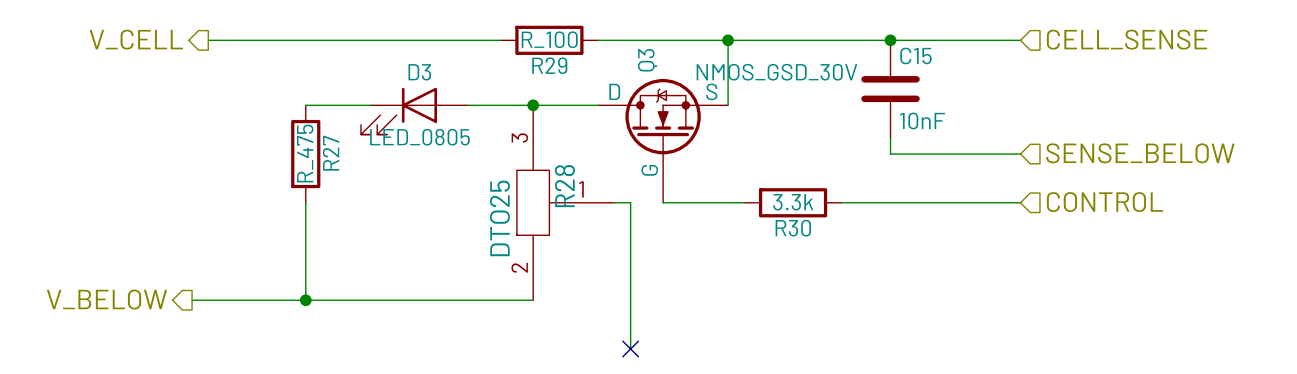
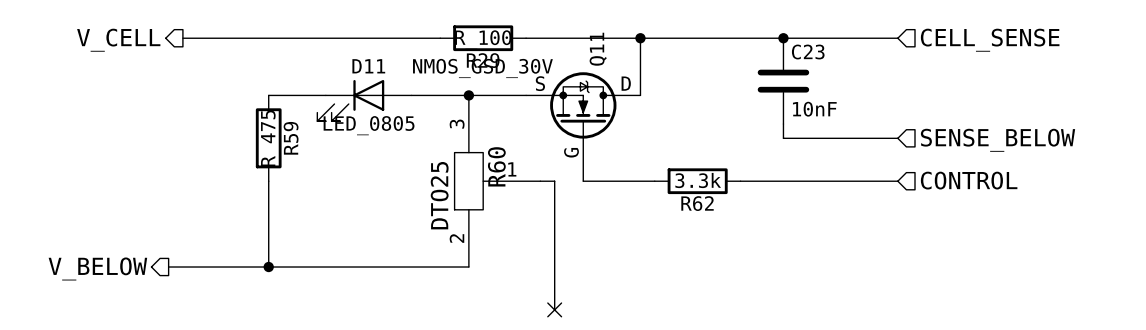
C15 name: C15 (915, 55) -> C23 (808, 52)
D3 name: D3 (419, 72) -> D11 (368, 66)
Q3: NMOS_GSD_30V (663, 140) -> none
Q11: none -> NMOS_GSD_30V (583, 126)
R27 name: R27 (331, 153) -> R59 (291, 138)
R28 name: R28 (564, 186) -> R60 (496, 166)
R30 name: R30 (793, 228) -> R62 (697, 203)

